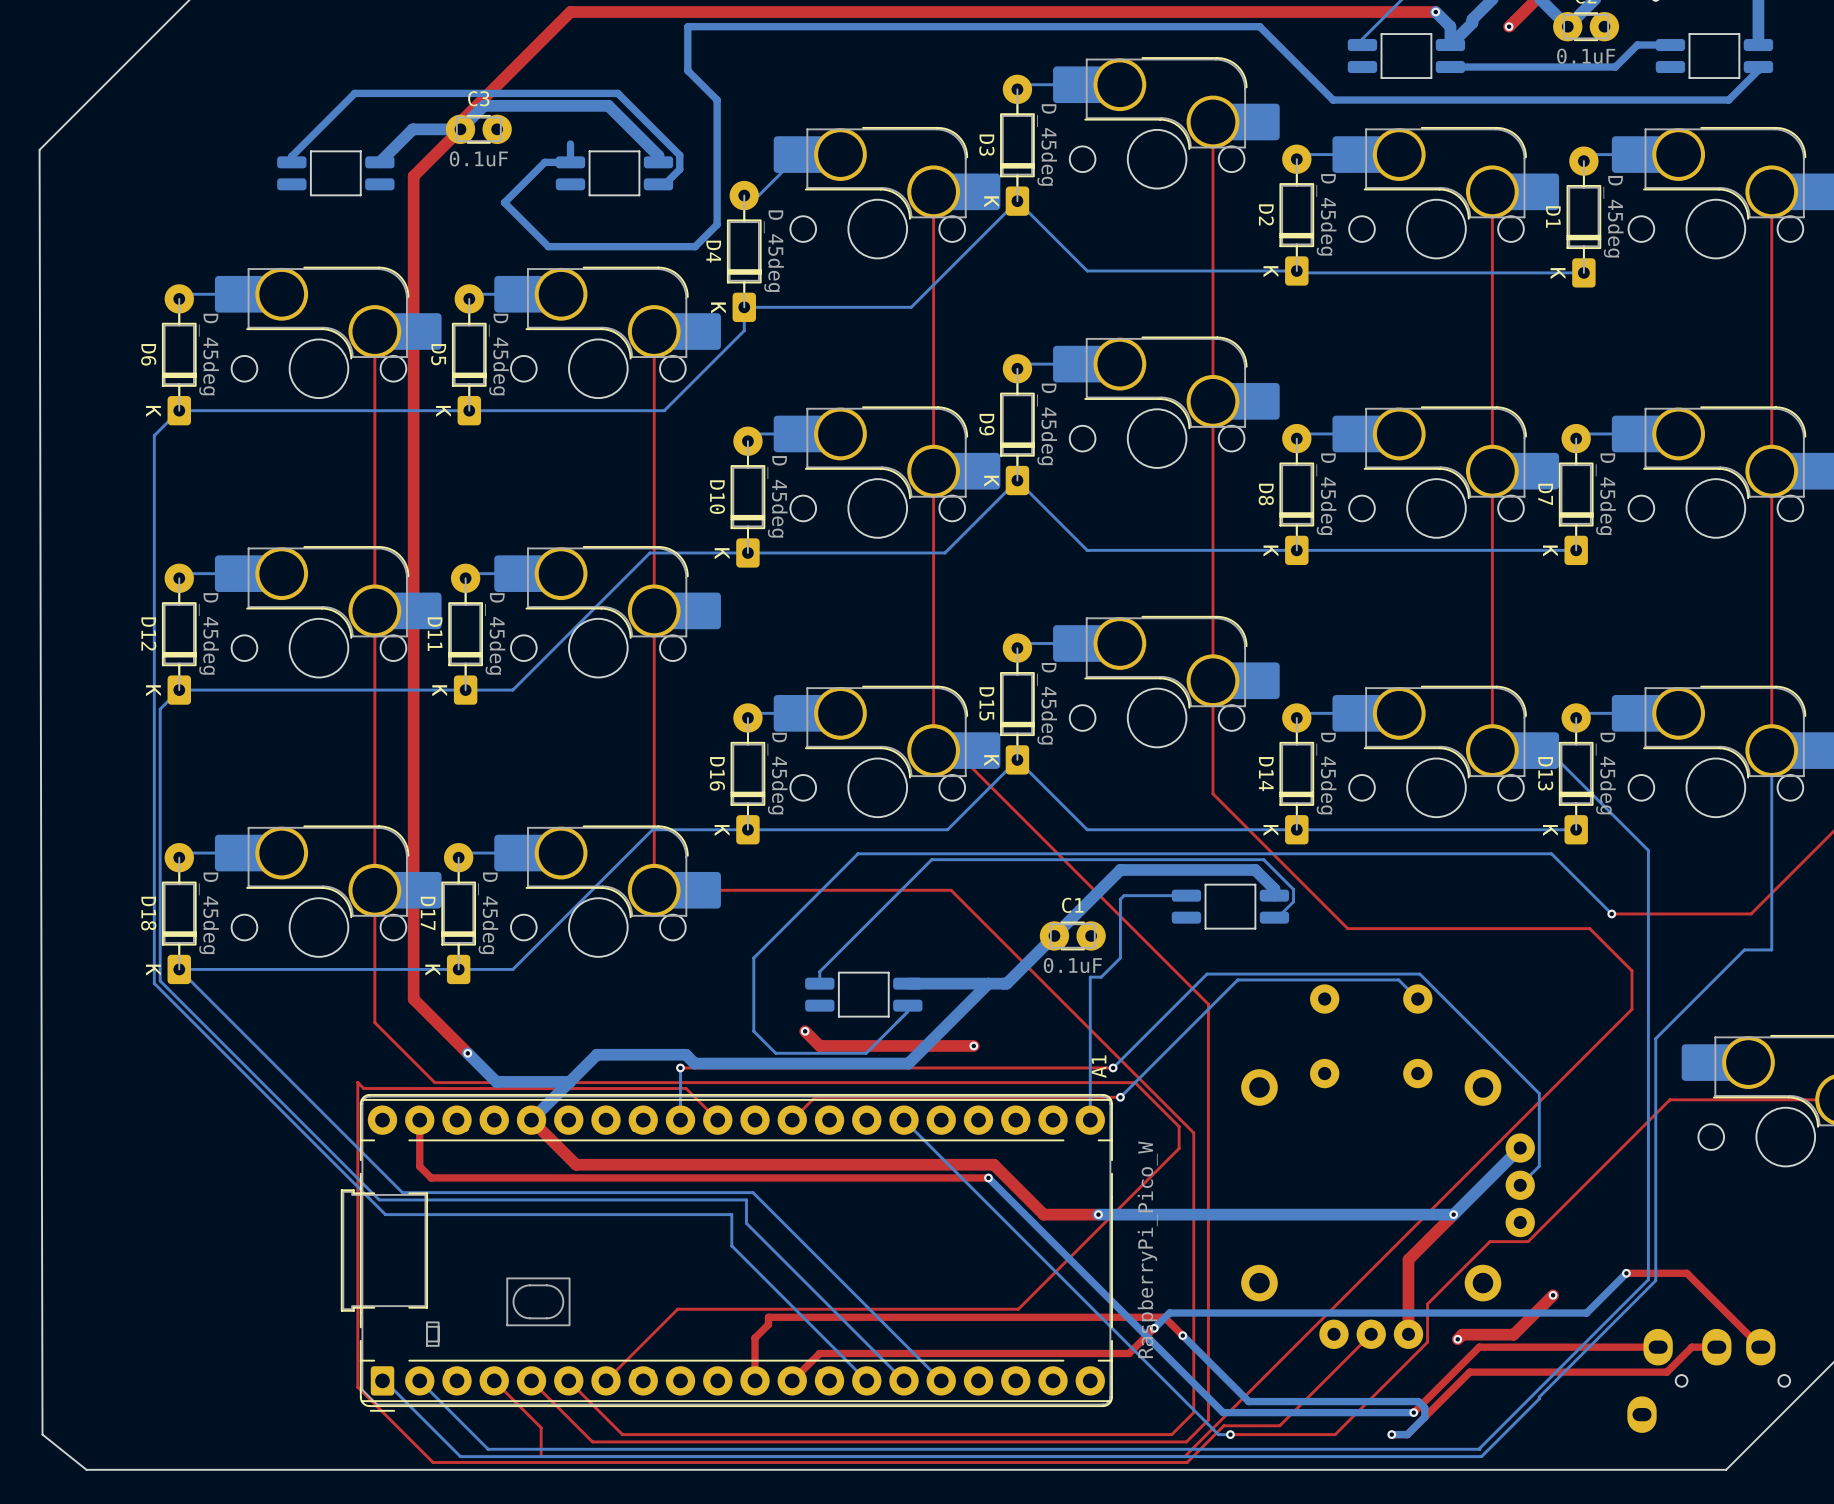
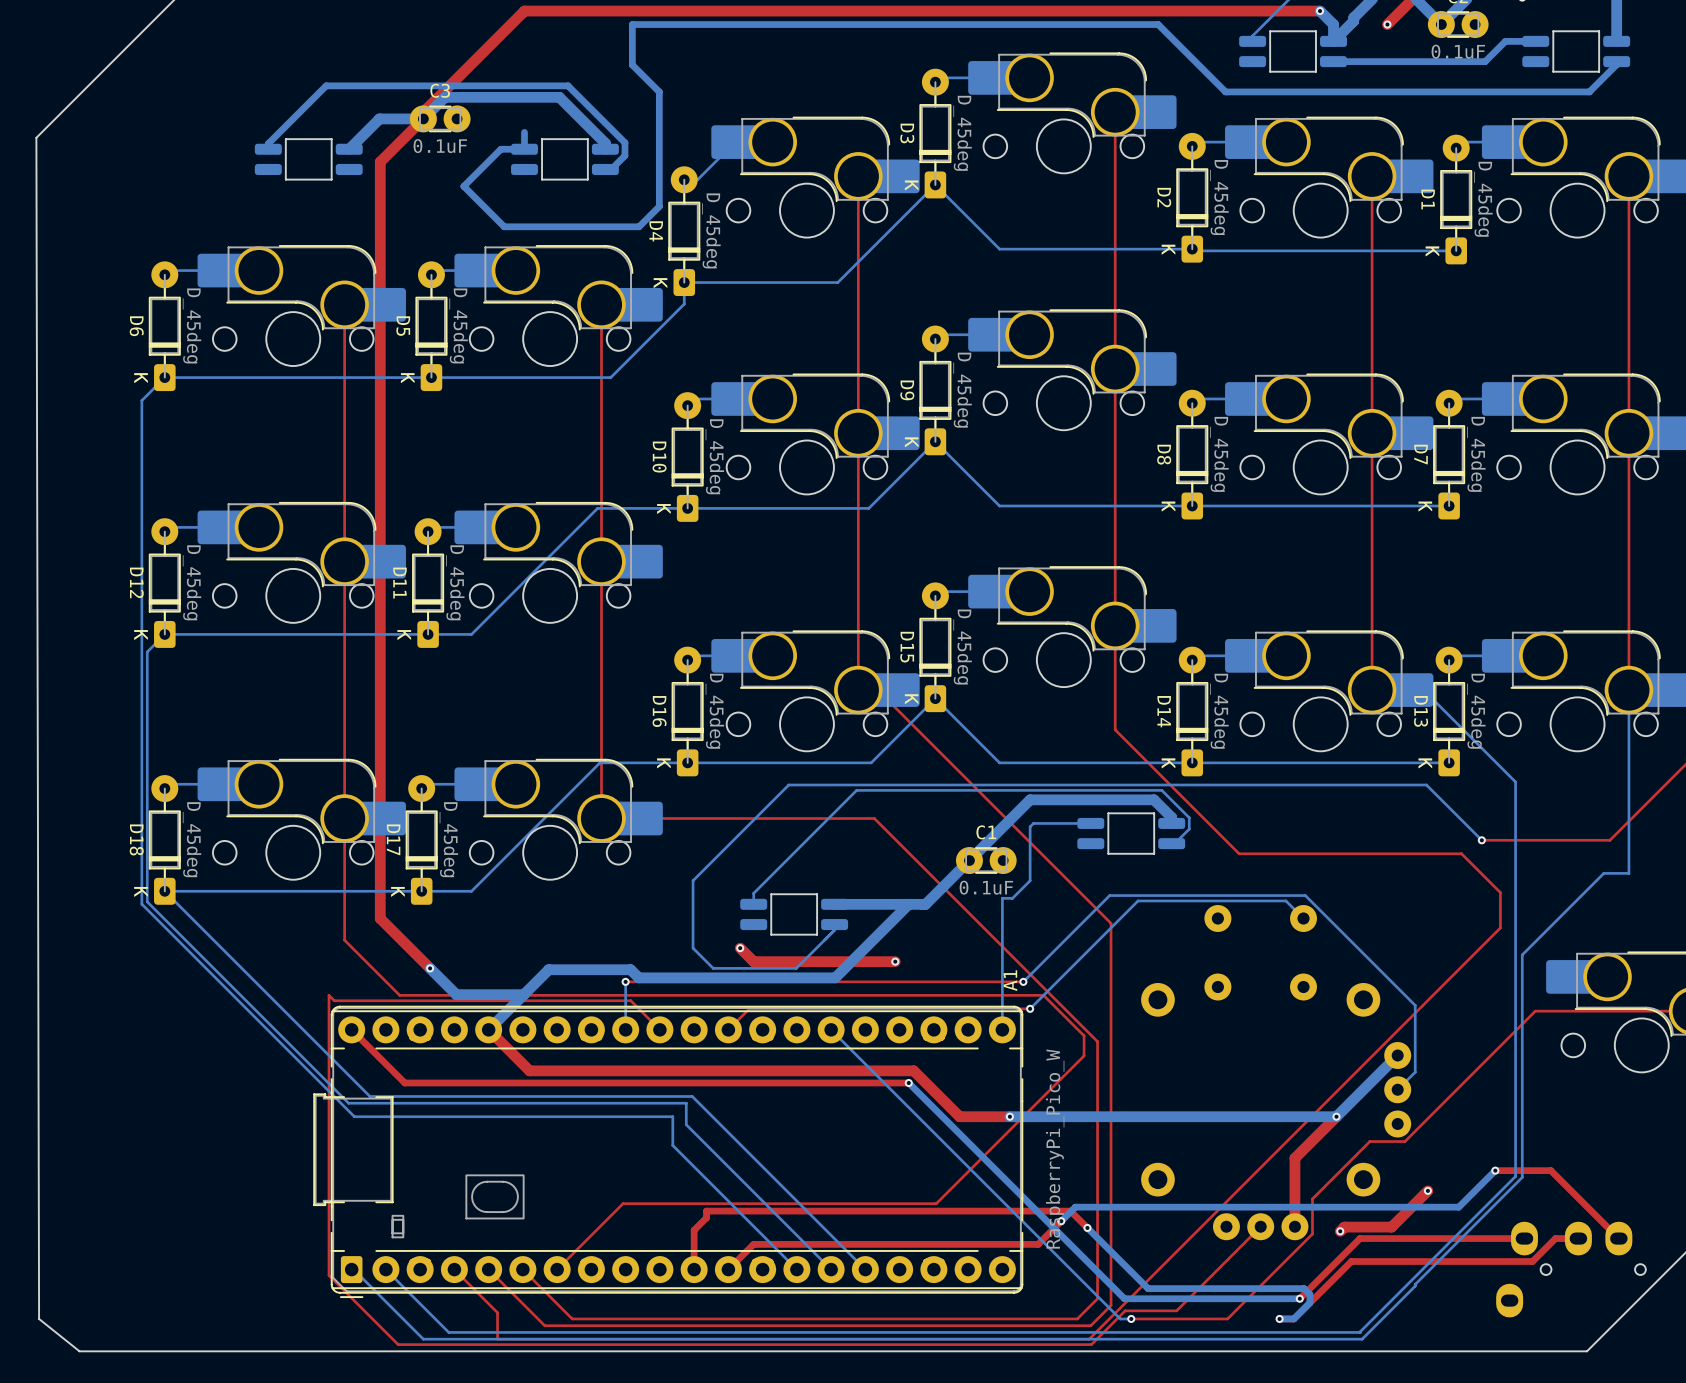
top track: (419, 1120) (419, 1166) (431, 1177) (440, 1177) -> (351, 1029) (404, 1083)

